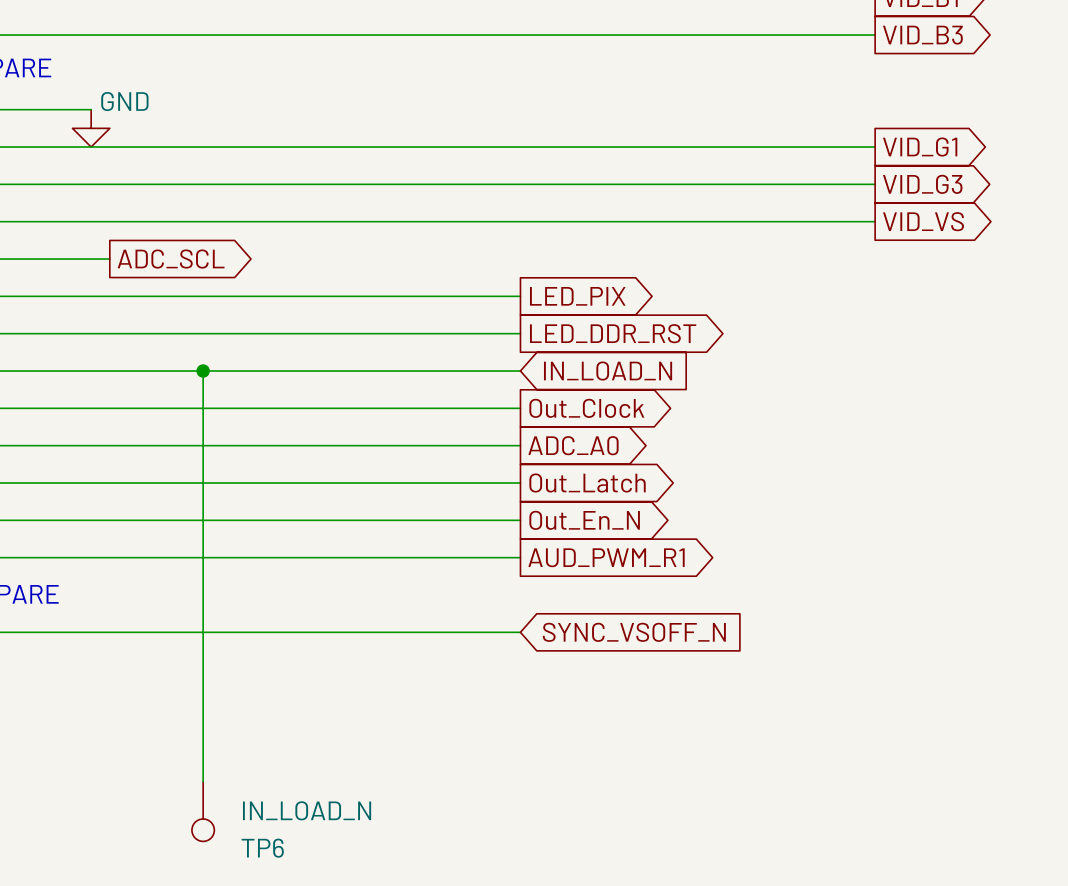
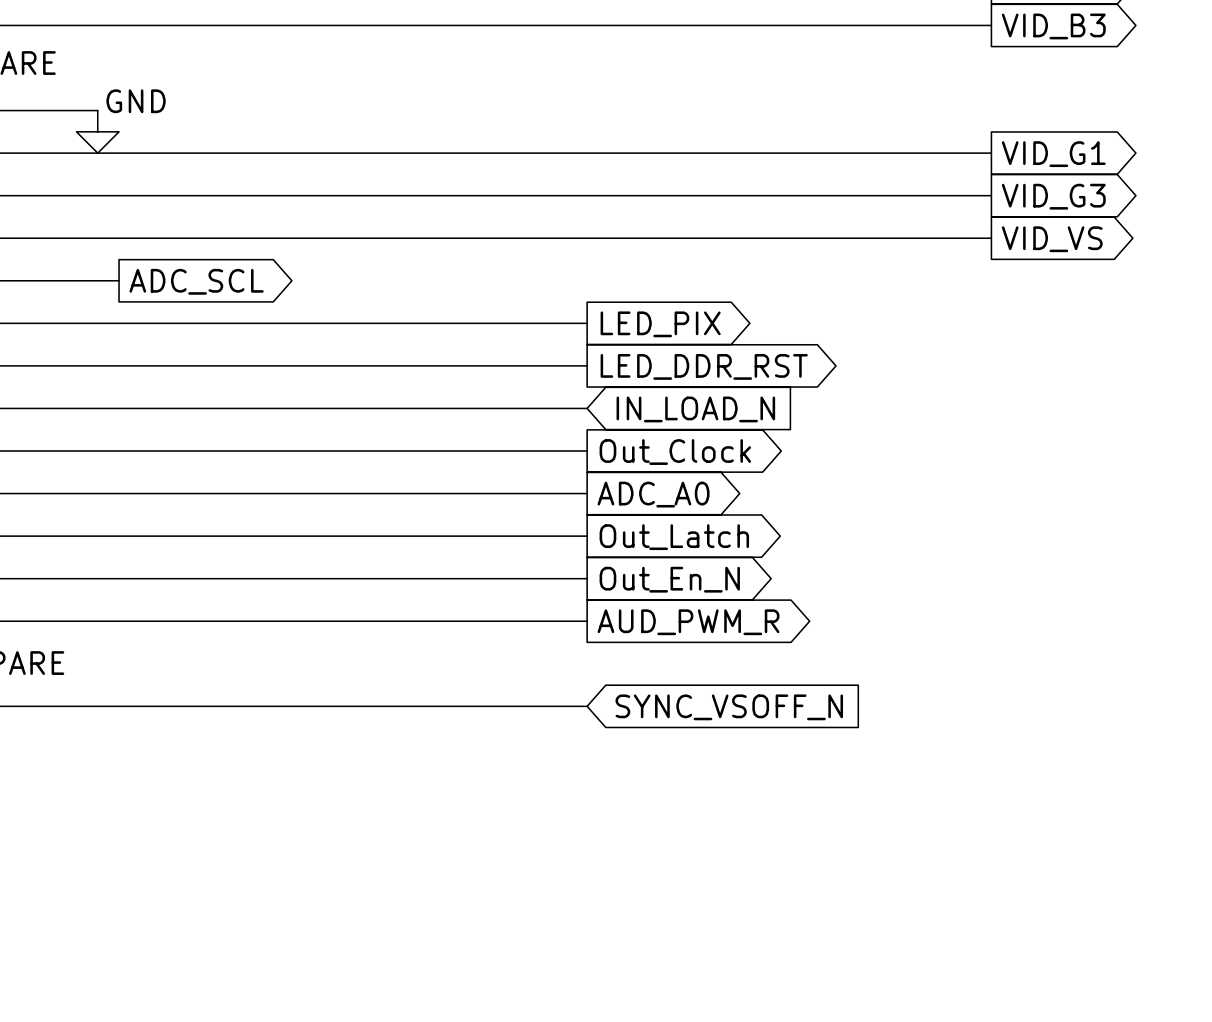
wire: (203, 371) (203, 781) -> none
junction: (203, 371) -> none
global label: AUD_PWM_R1 (606, 557) -> AUD_PWM_R (688, 622)
TP6: IN_LOAD_N (203, 811) -> none

